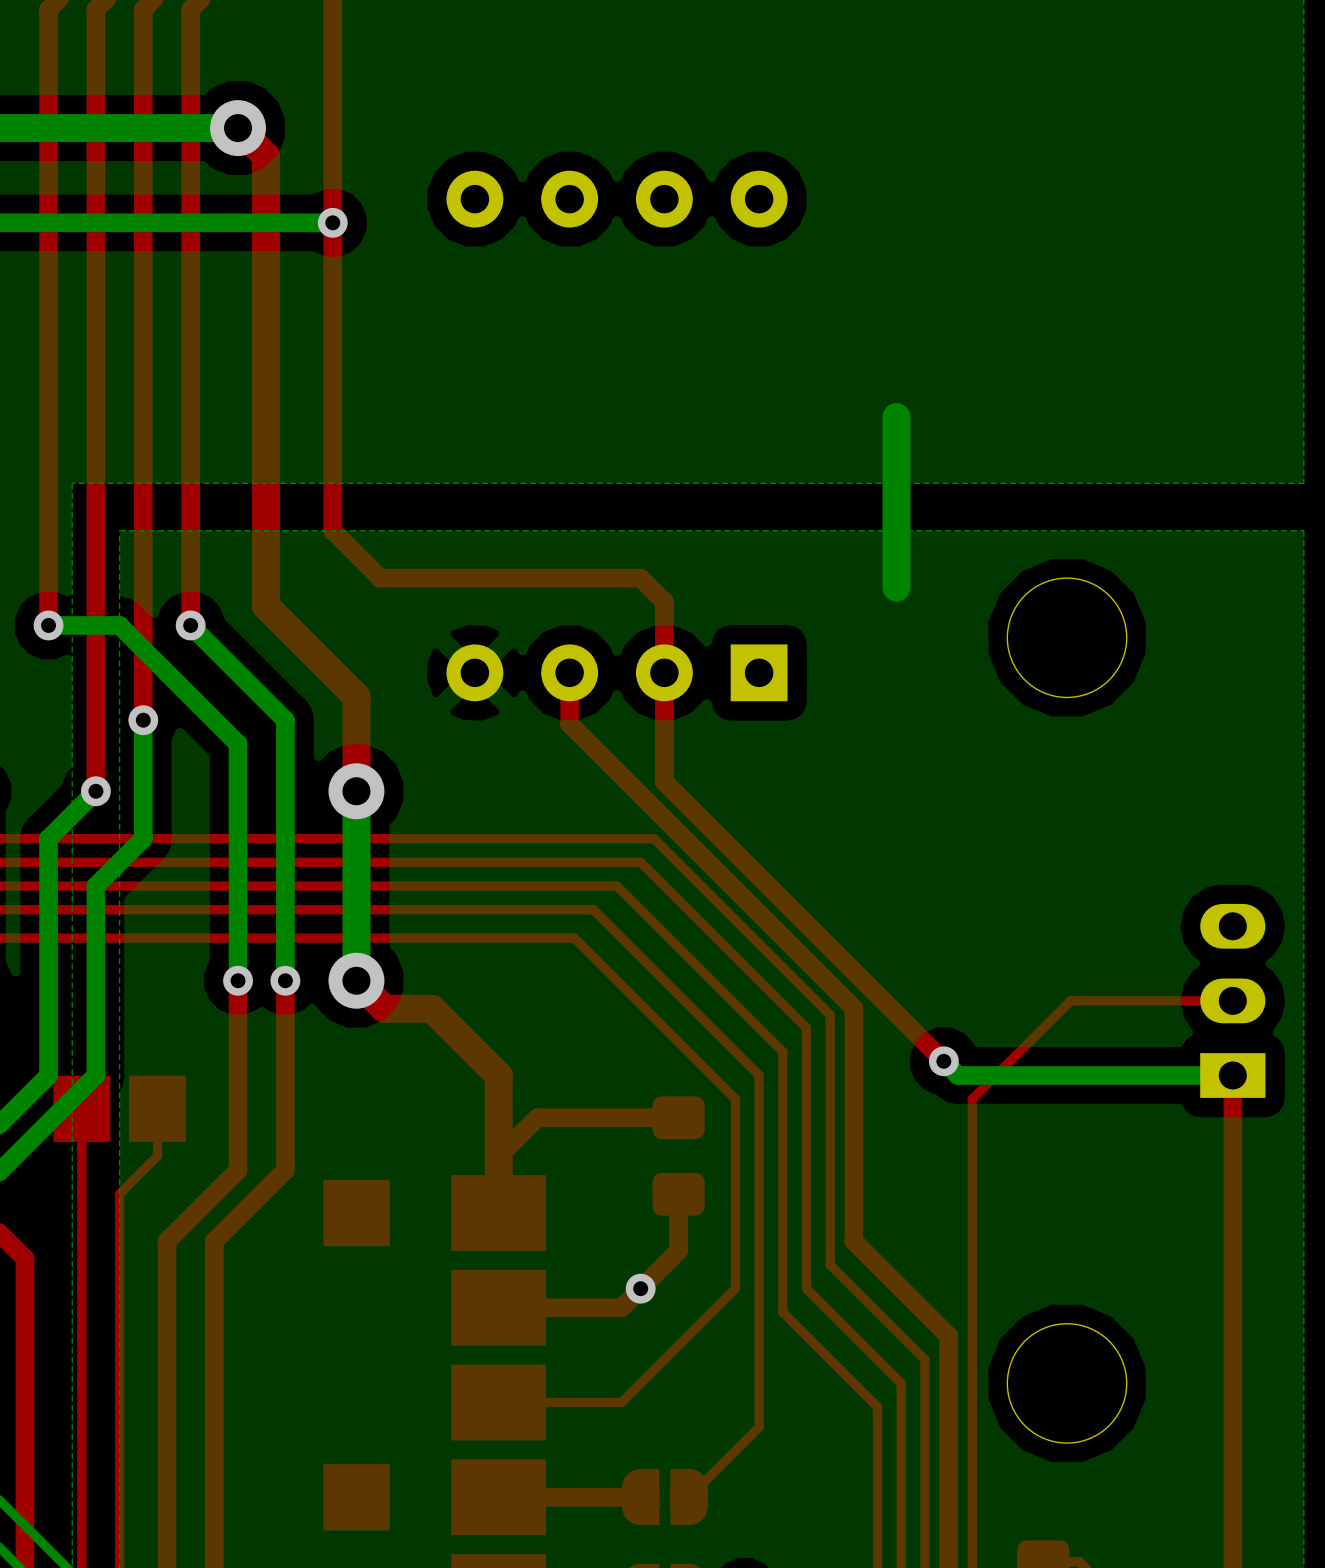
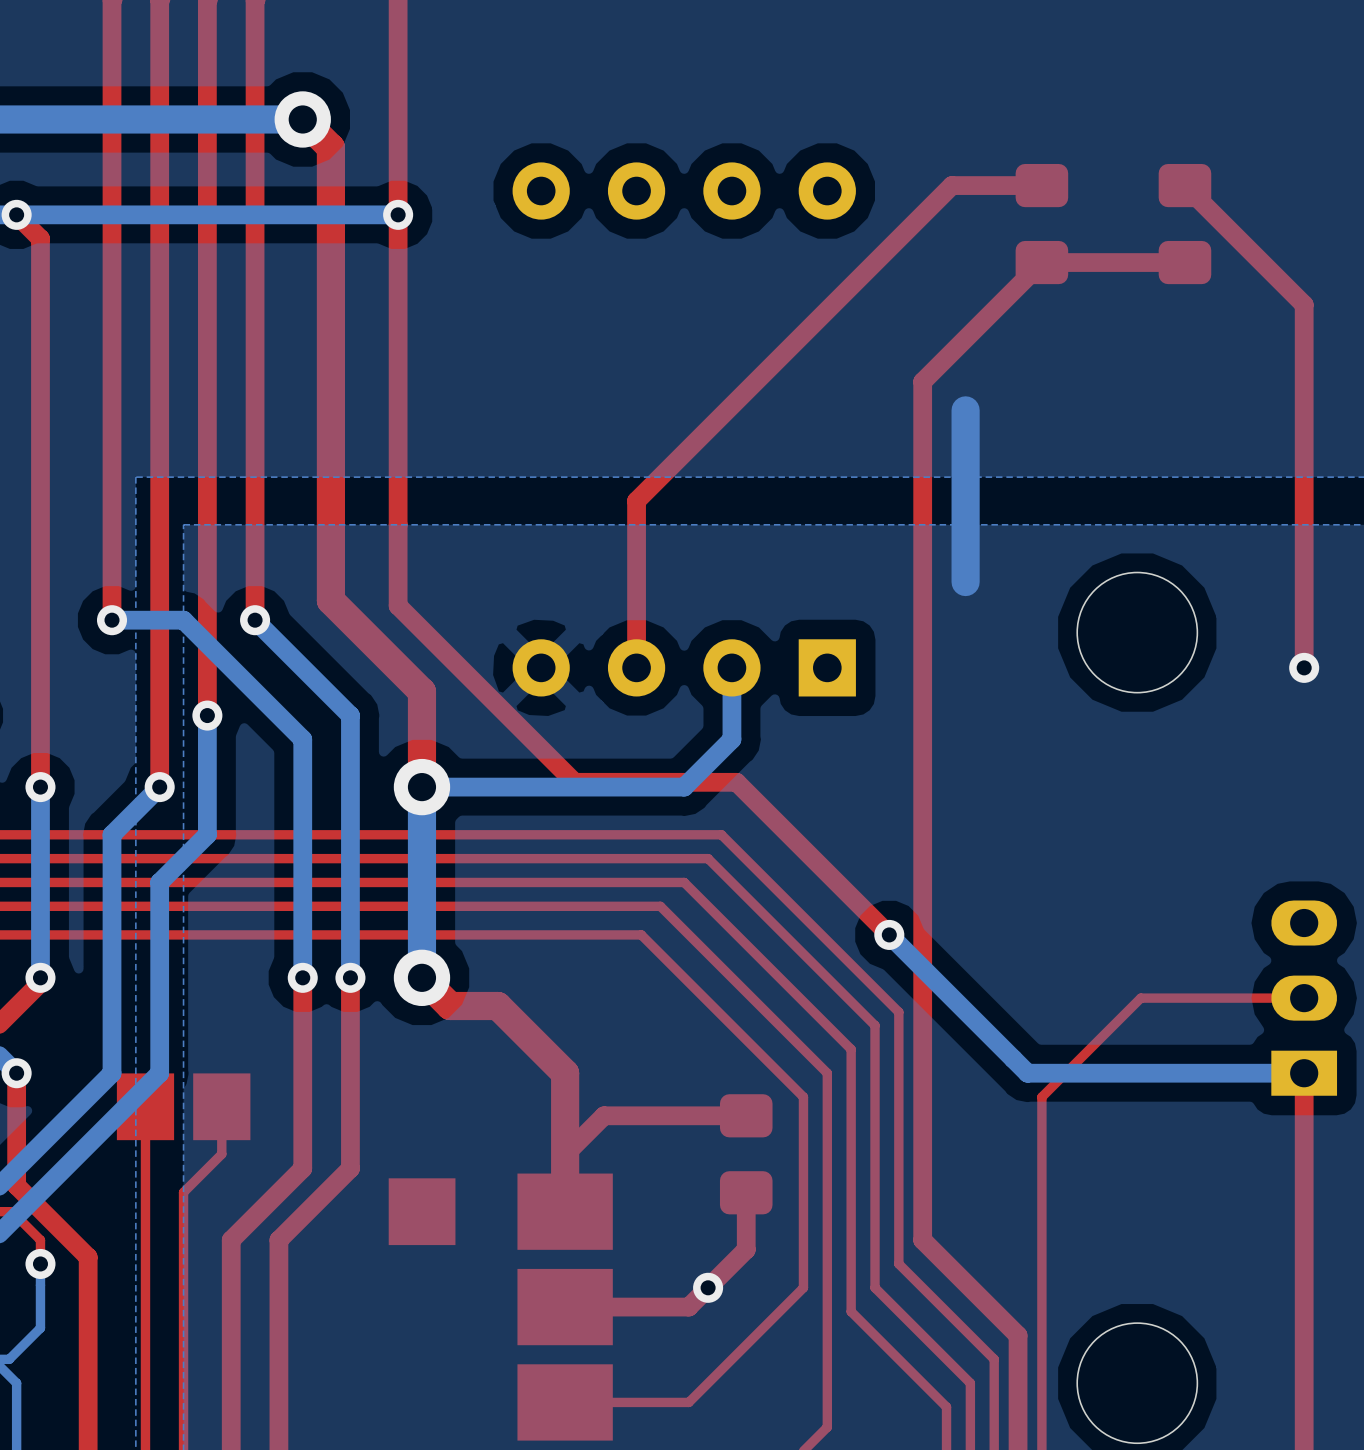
top track: none -> (1041, 185) (951, 185) (636, 500) (636, 667)
top track: none -> (1184, 185) (1304, 304) (1304, 667)
part: none -> (1041, 224)
part: none -> (1184, 224)
top track: (332, 530) (380, 578) (640, 578) (664, 601) (664, 781) (669, 786) -> (398, 524) (398, 605) (574, 782) (736, 782)
top track: (569, 672) (569, 723) (853, 1008) (853, 1241) -> (1184, 262) (1041, 262) (922, 381) (922, 1240)
bottom track: none -> (731, 667) (731, 739) (684, 787) (421, 787)
via: none -> (1304, 667)
bottom track: none -> (889, 934) (1013, 1058)
top track: (820, 938) (943, 1061) -> none
via position: (943, 1061) -> (889, 934)

